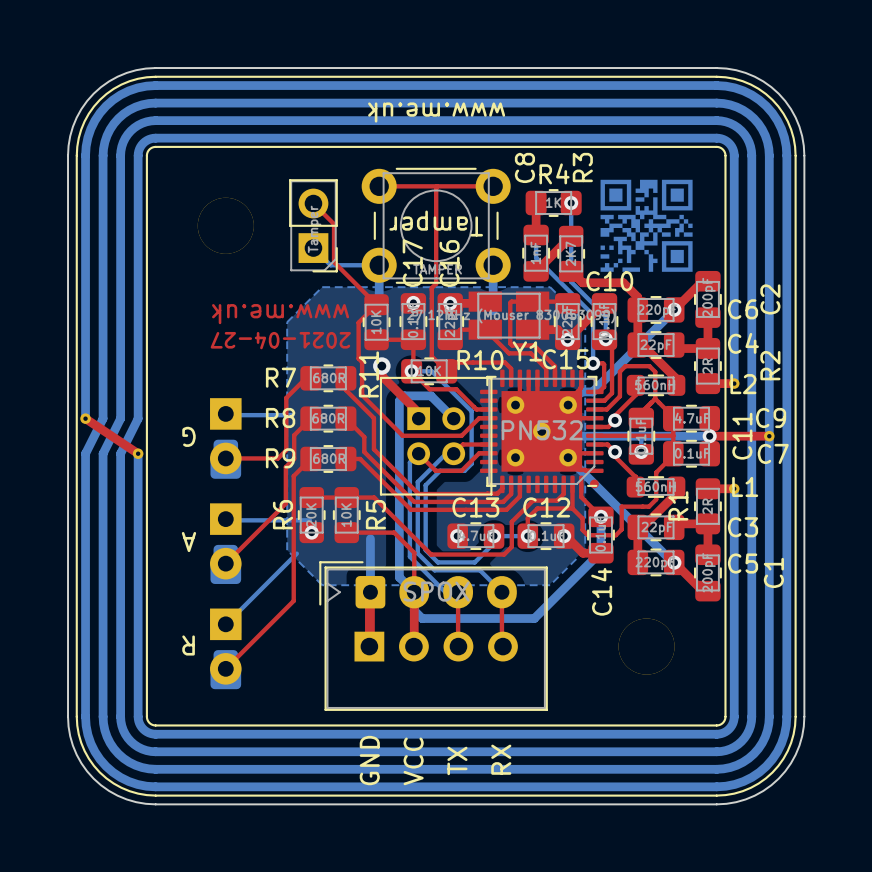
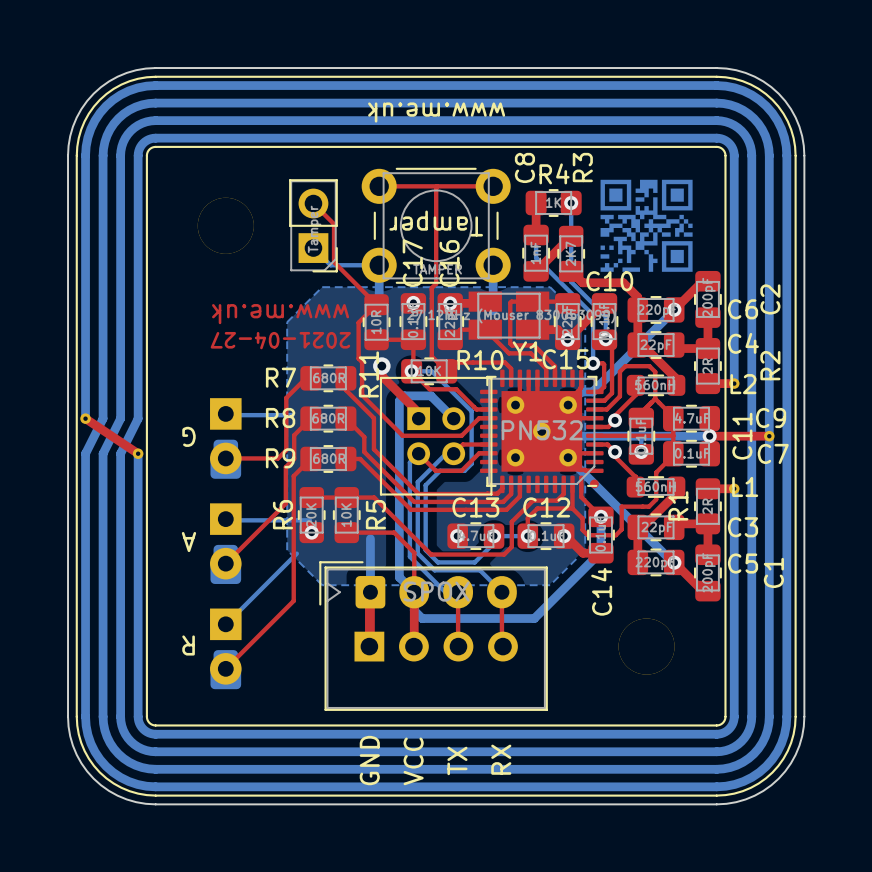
R11 value: 10K (376, 322) -> 10R (376, 322)

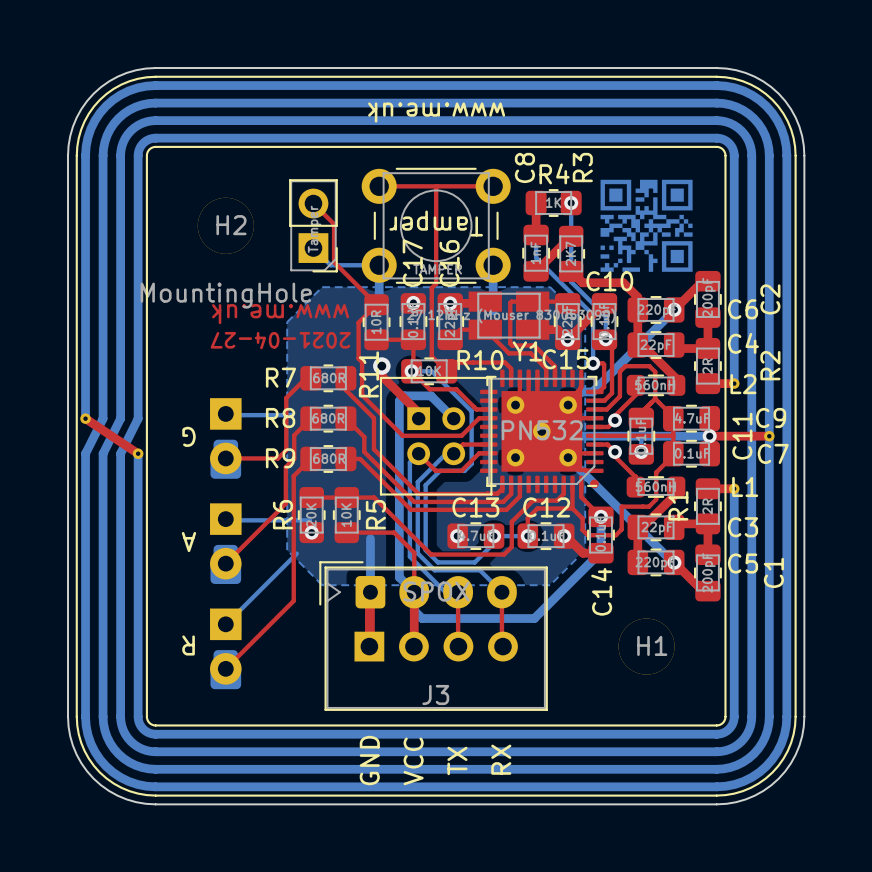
H2 name: none -> H2 (231, 225)
H2 value: none -> MountingHole (226, 295)
H1 name: none -> H1 (652, 645)
J3 name: none -> J3 (435, 695)

